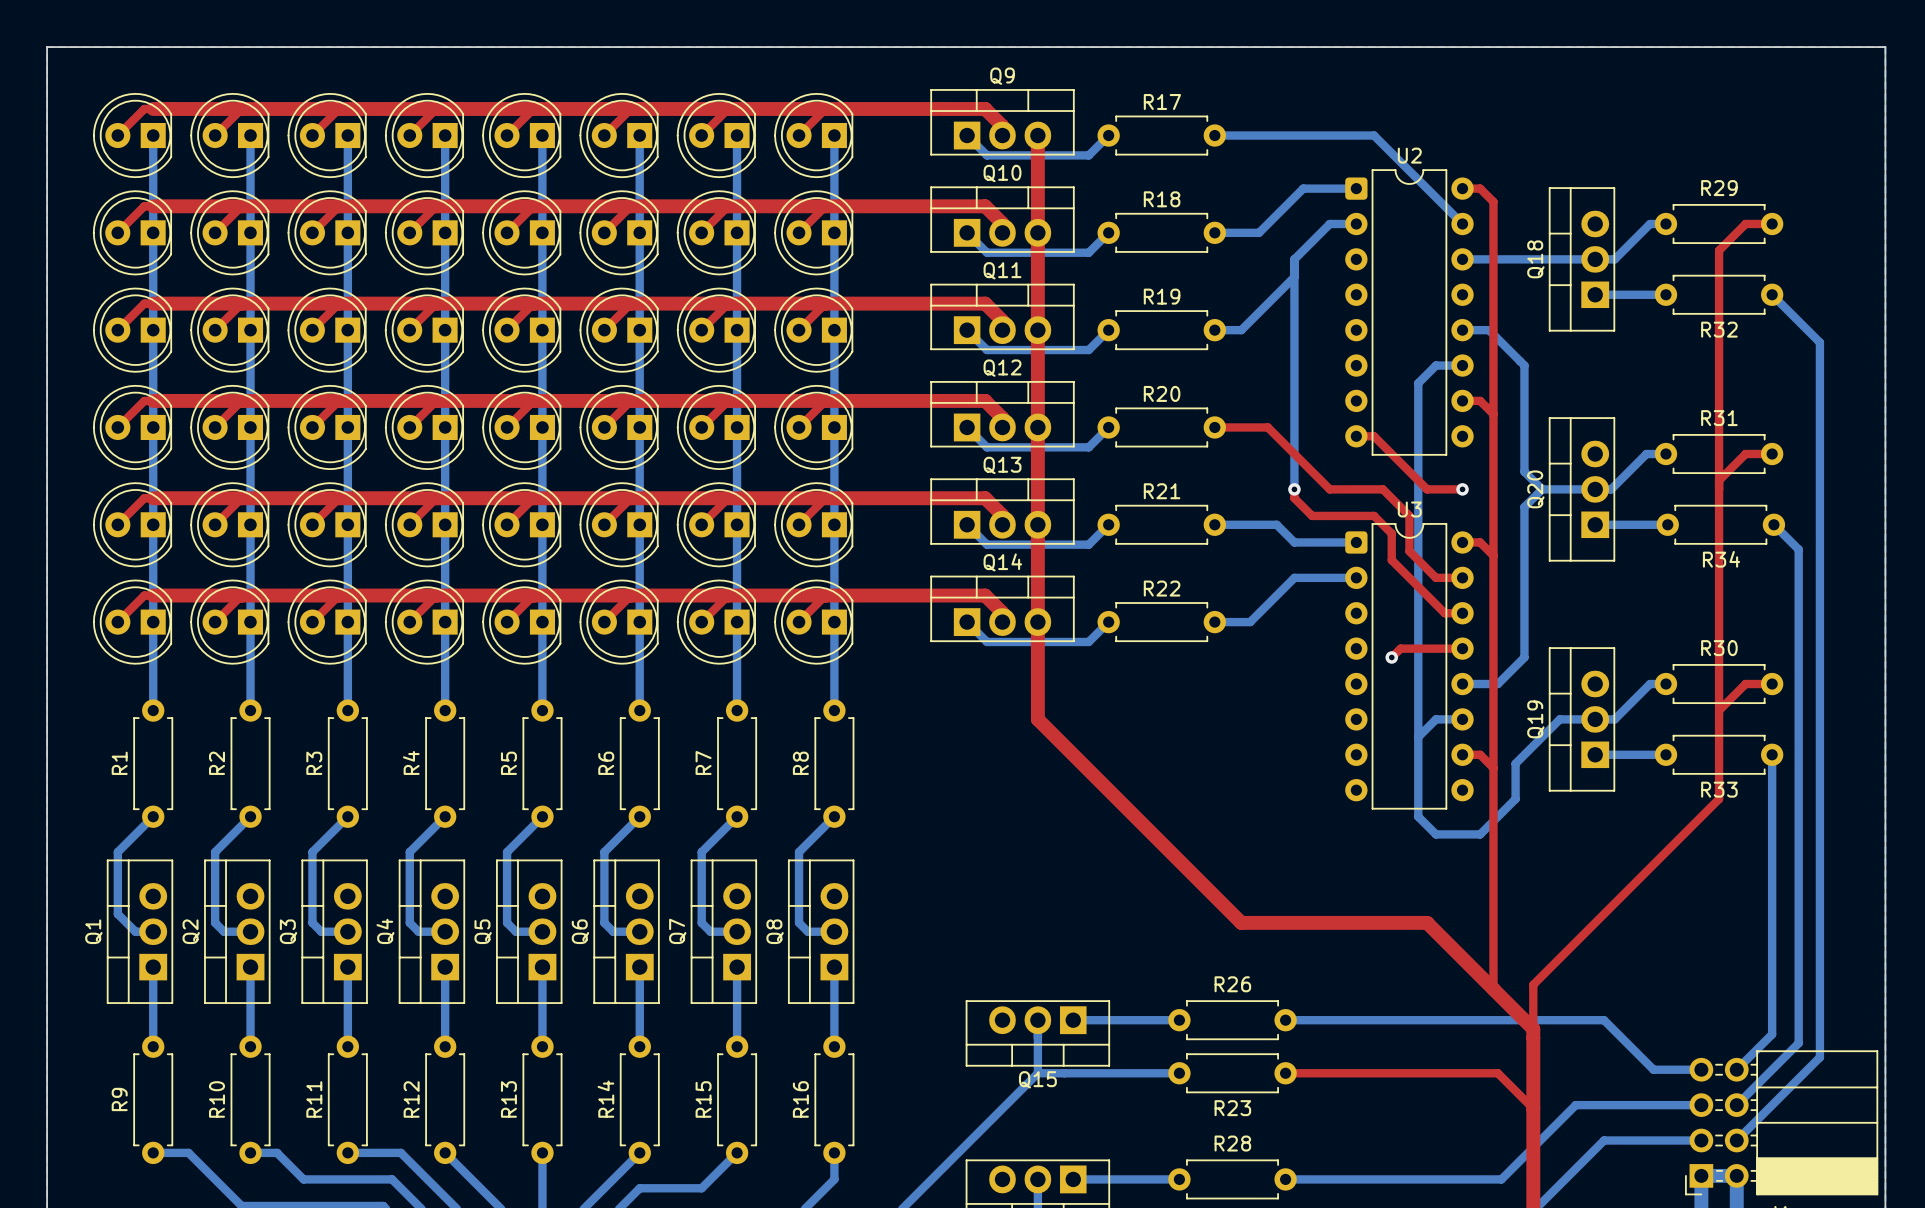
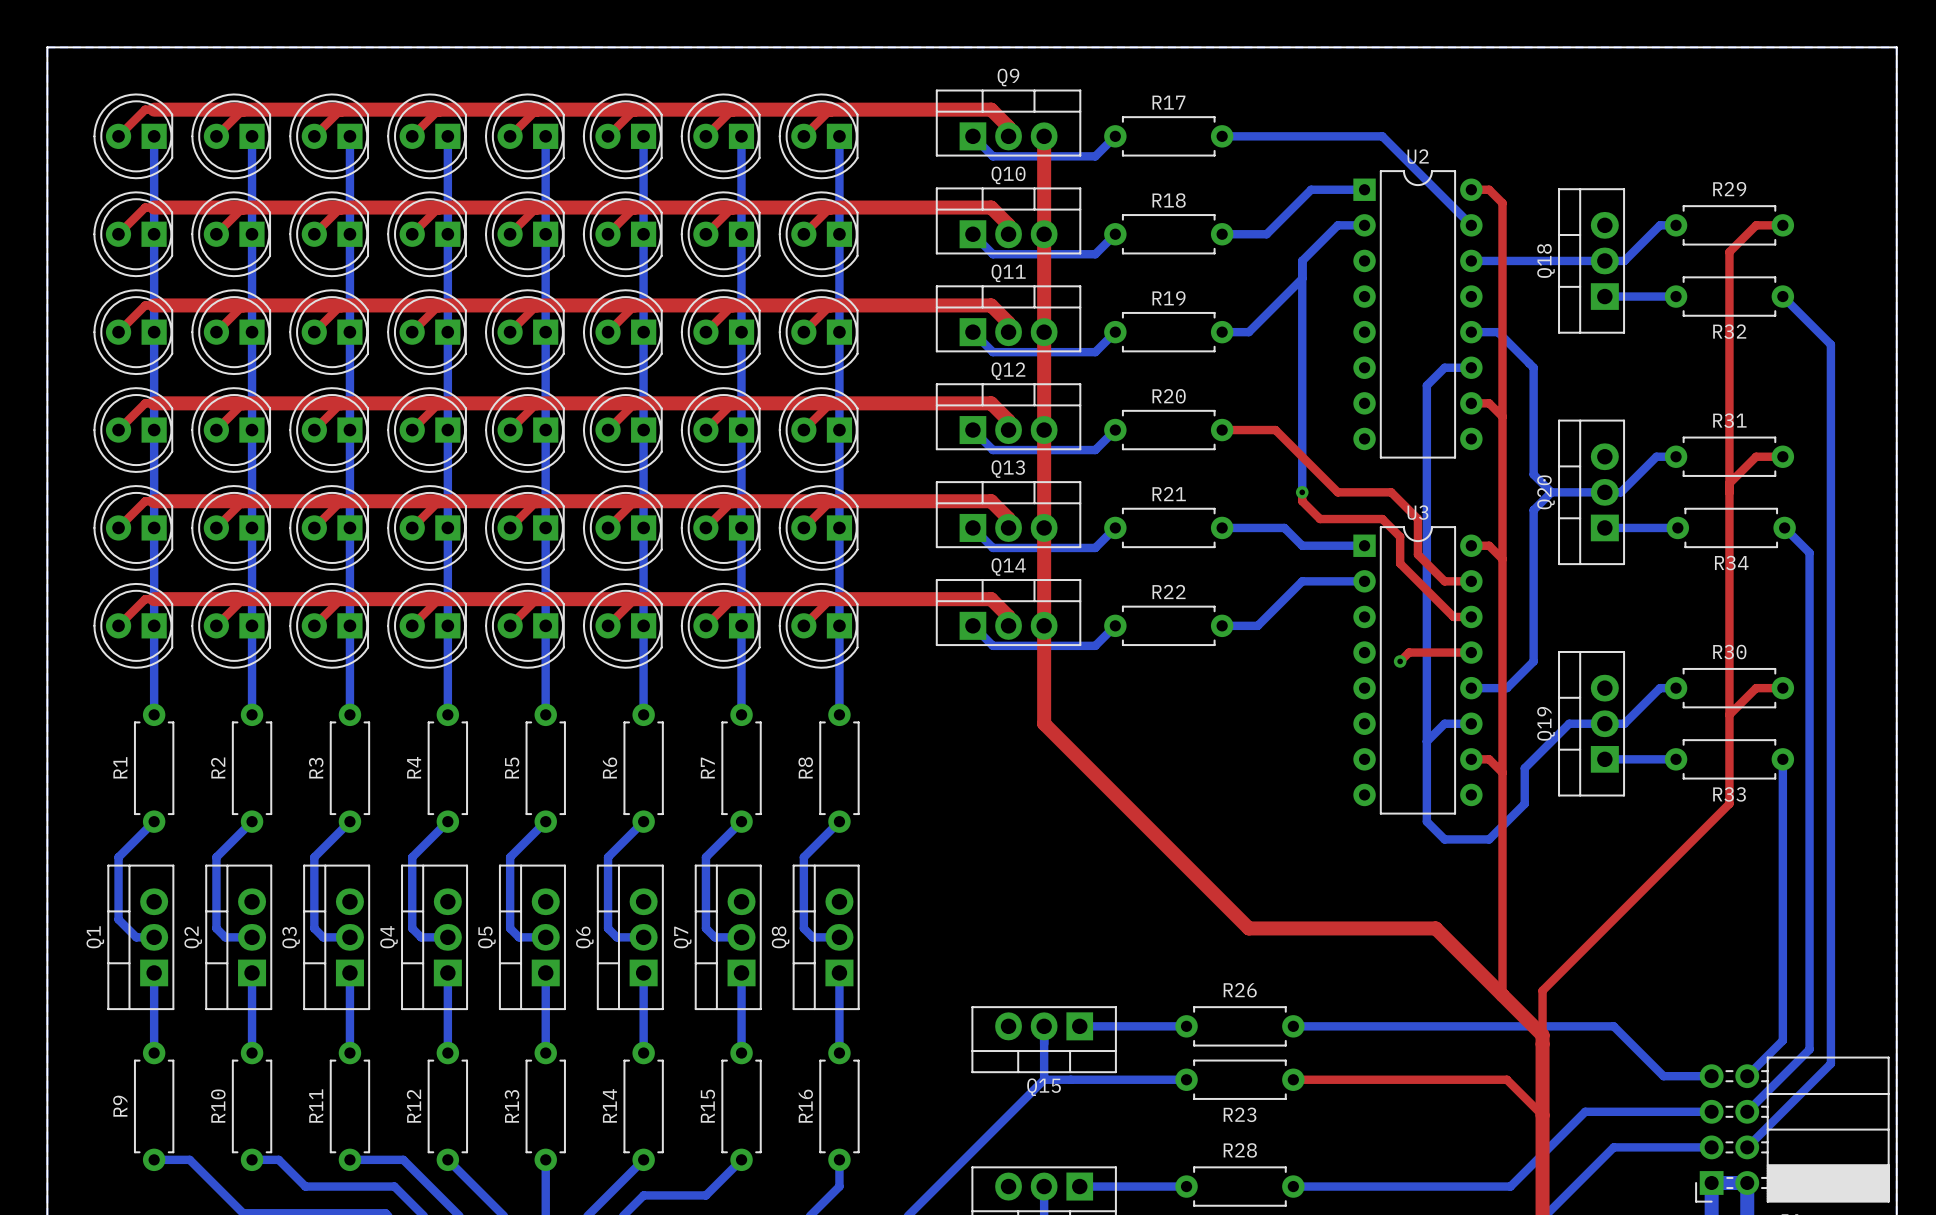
U2 footprint: [1345, 169, 1474, 456] -> [1353, 170, 1483, 459]
top track: (1356, 436) (1374, 436) (1427, 489) (1462, 489) -> none
via: (1462, 489) -> none
U3 footprint: [1345, 523, 1474, 810] -> [1353, 526, 1483, 815]

